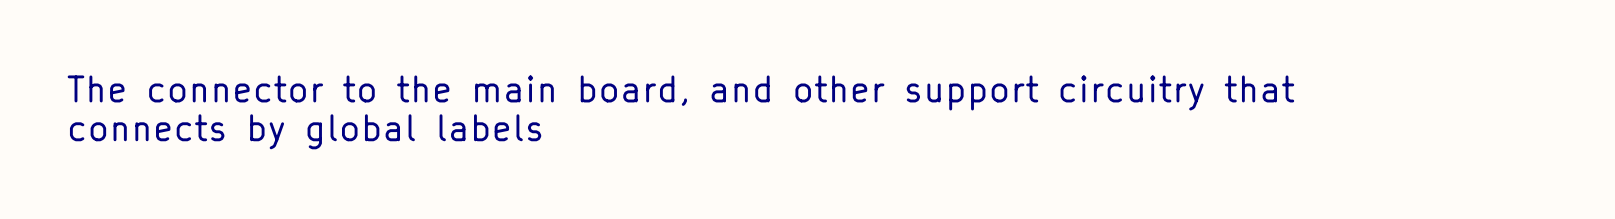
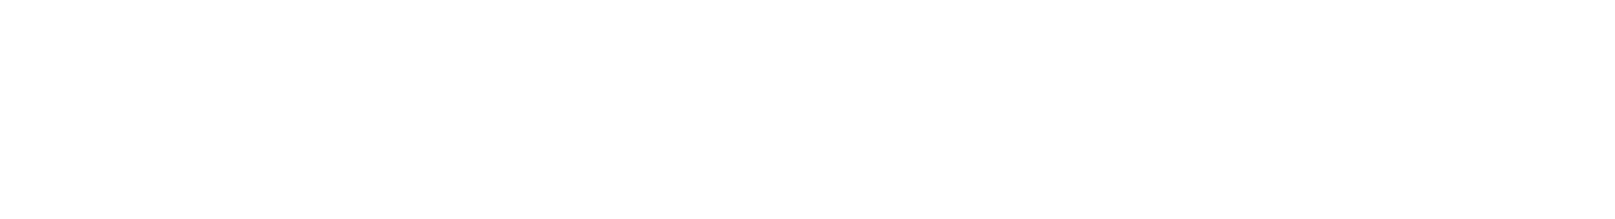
text: The connector to the main board, and other support circuitry that (680, 92) -> none
text: connects by global labels (305, 131) -> none

